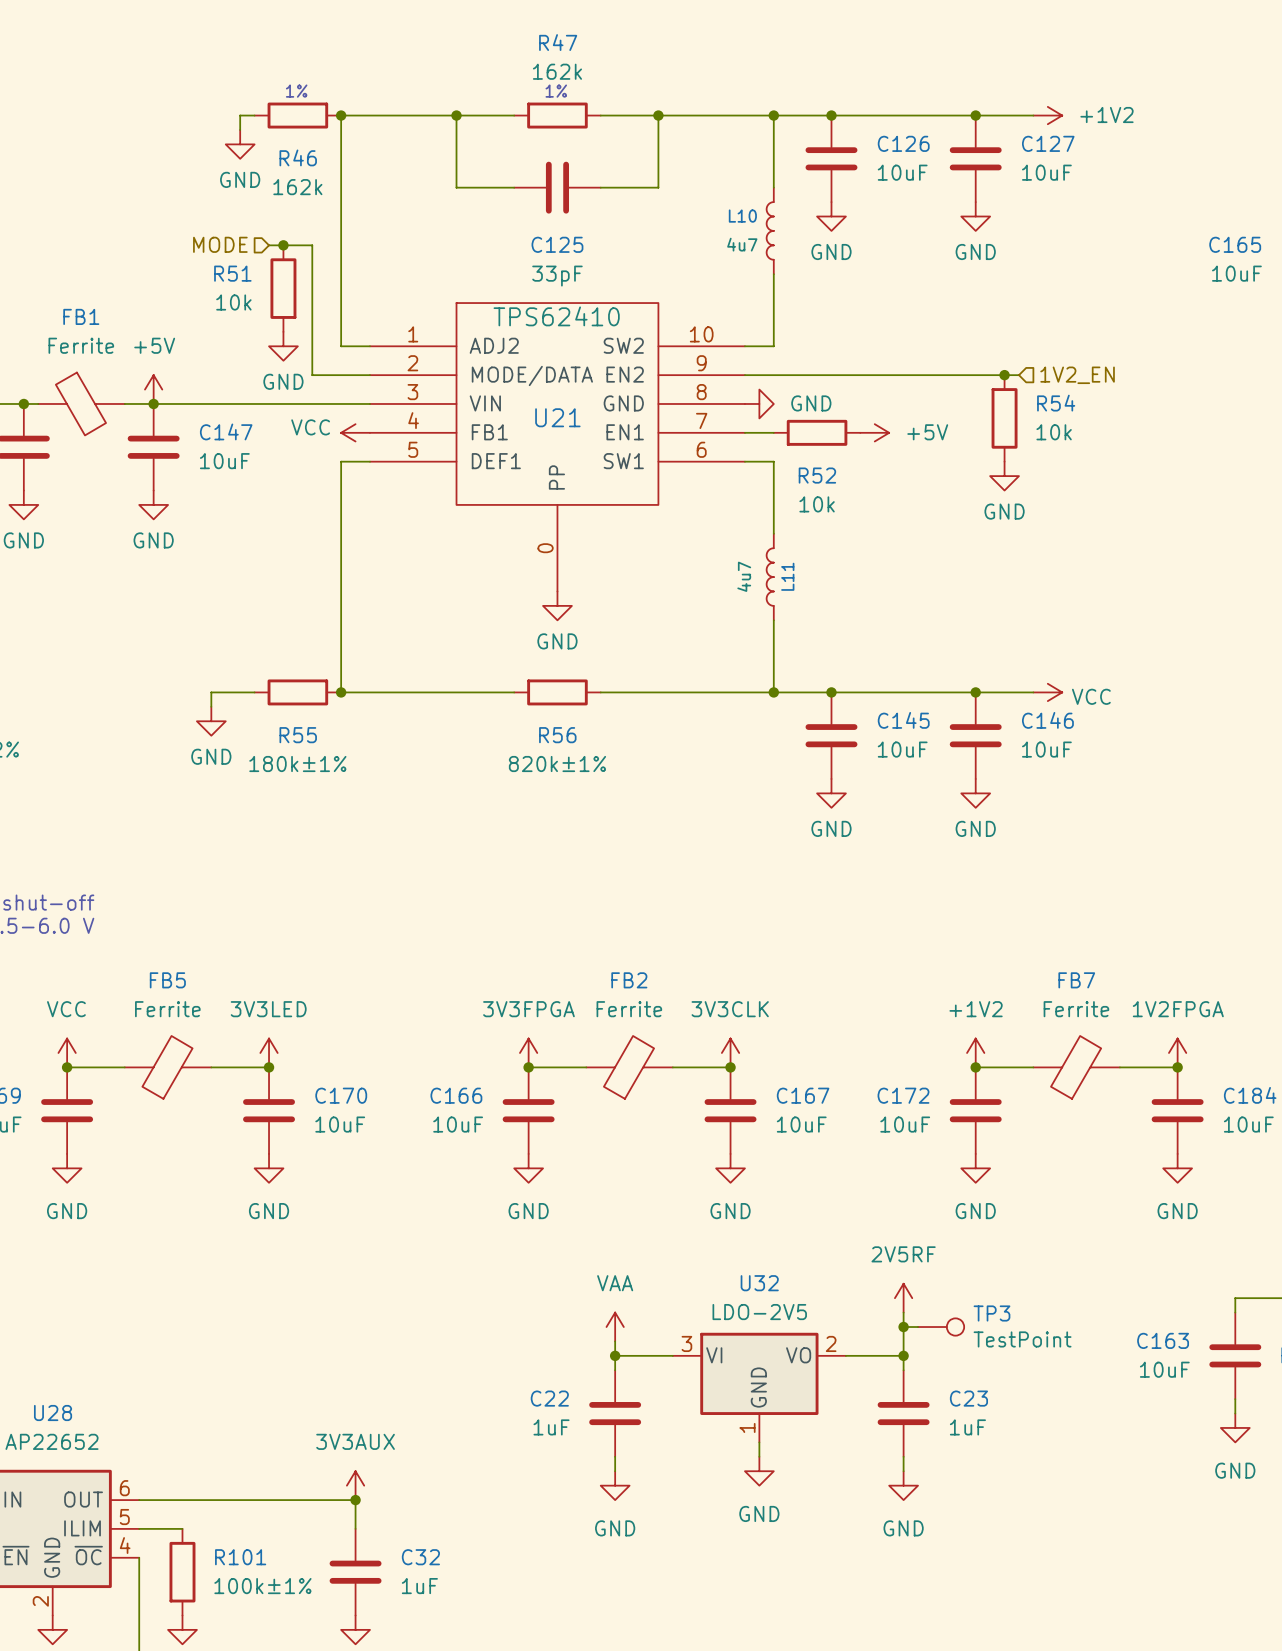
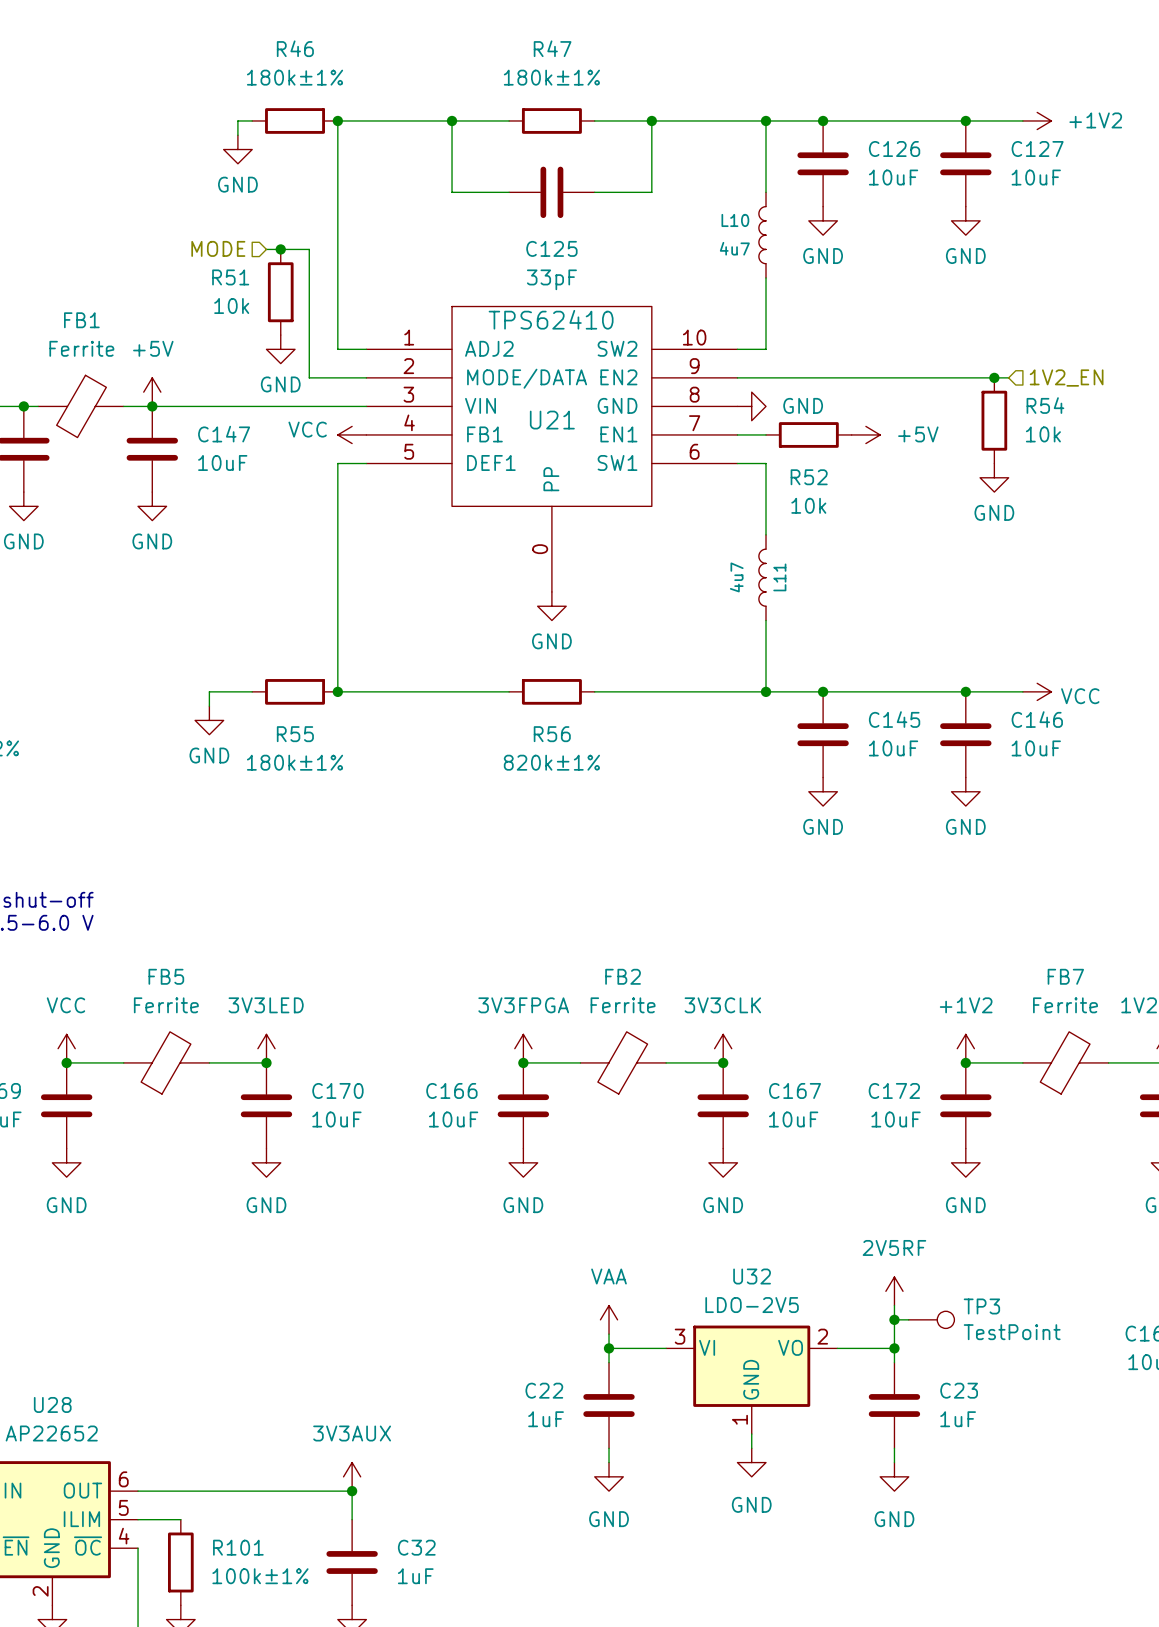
R47 value: 162k (557, 71) -> 180k±1% (551, 77)
text: 1% (296, 91) -> none
text: 1% (556, 91) -> none
R46 name position: R46 (298, 157) -> R46 (295, 48)
R46 value: 162k (297, 187) -> 180k±1% (295, 77)
FB1 flip: as is (80, 403) -> left-right (81, 406)

